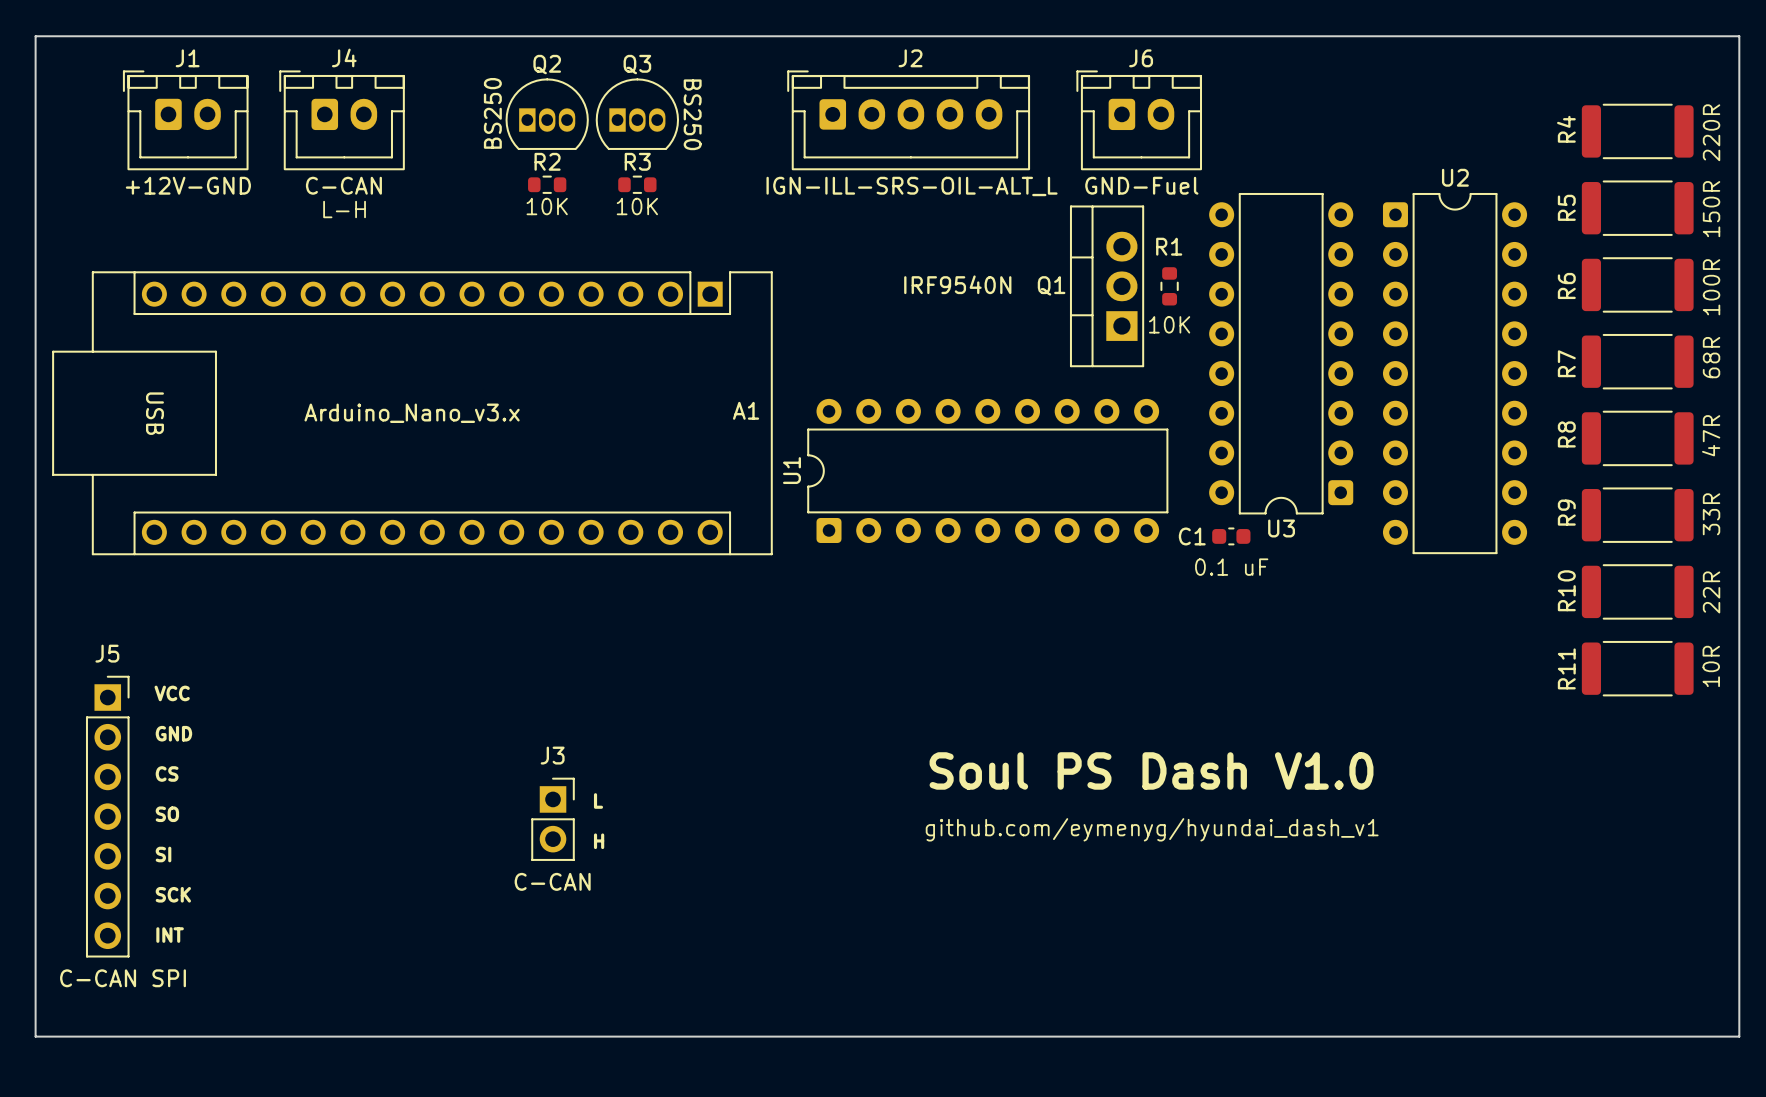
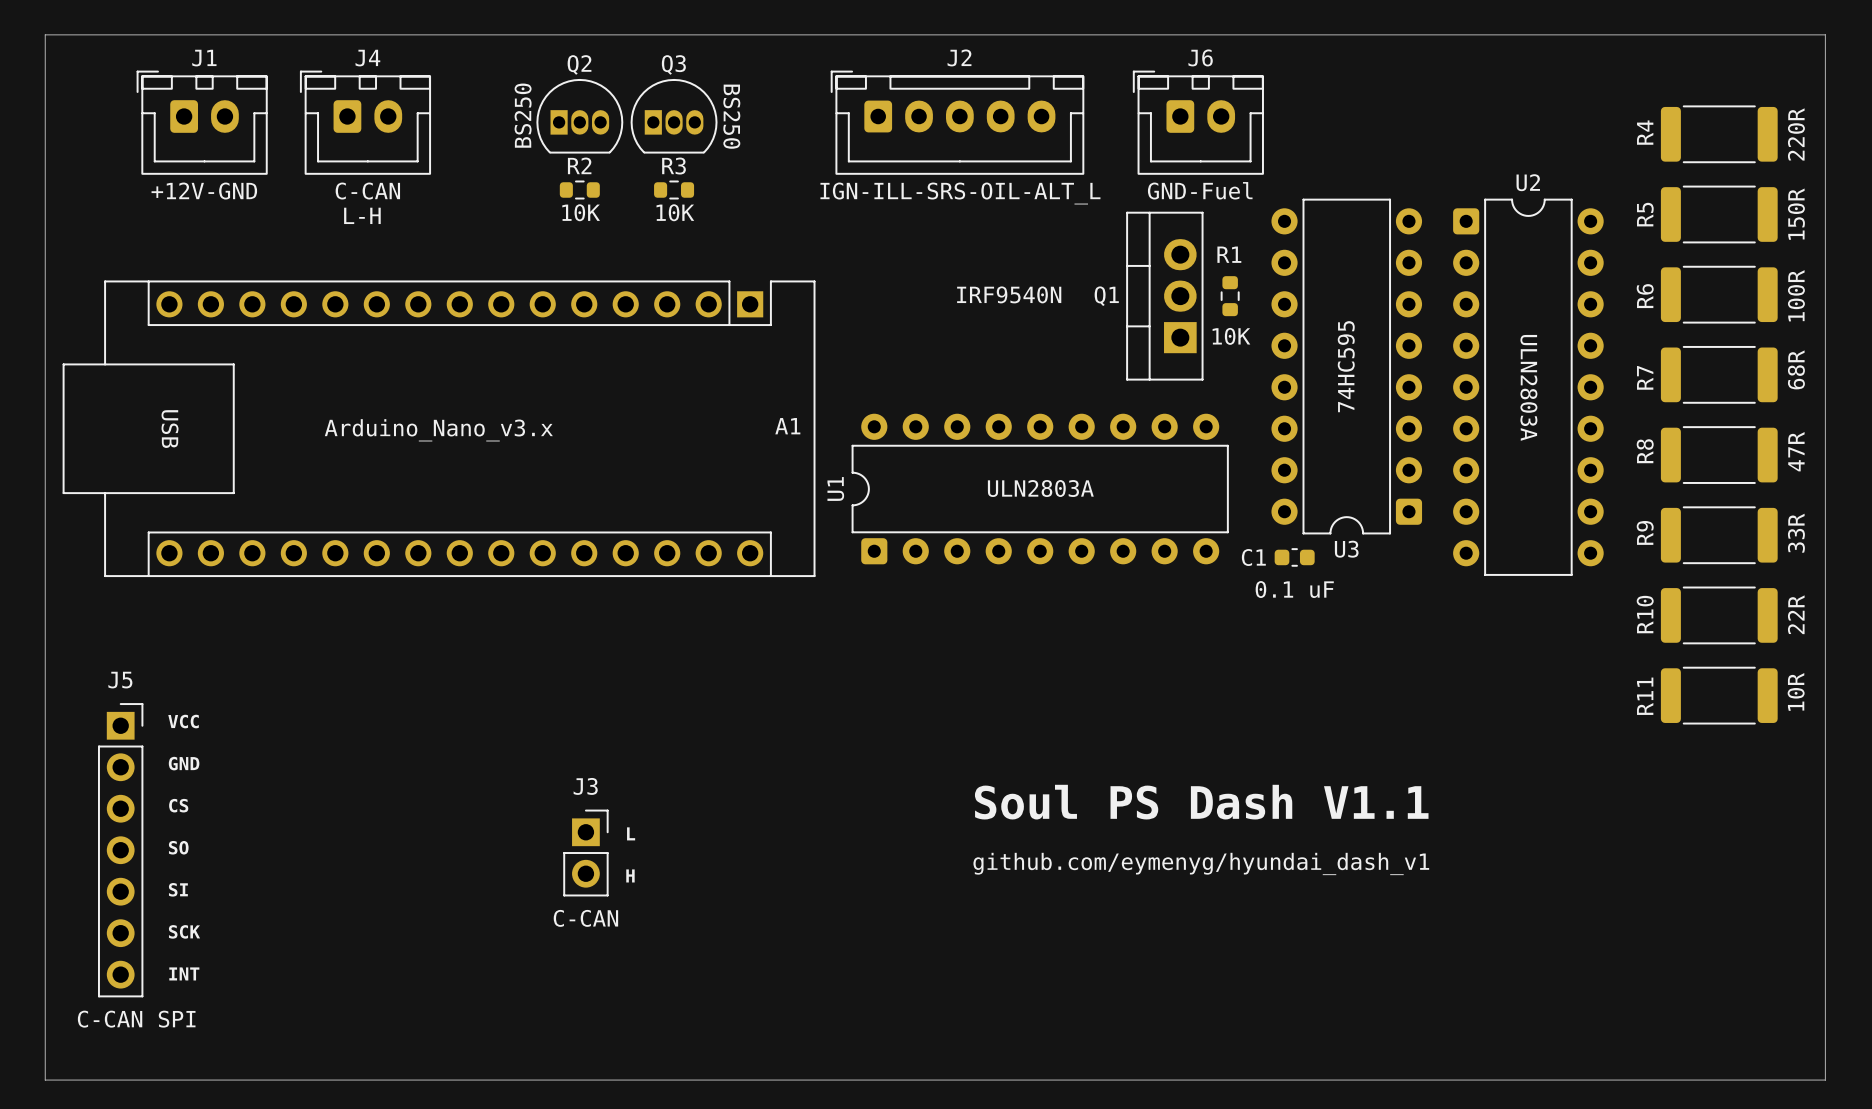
U3 value: none -> 74HC595 (1346, 366)
U2 value: none -> ULN2803A (1528, 387)
U1 value: none -> ULN2803A (1040, 488)
text: Soul PS Dash V1.0 (1151, 770) -> Soul PS Dash V1.1 (1201, 802)

